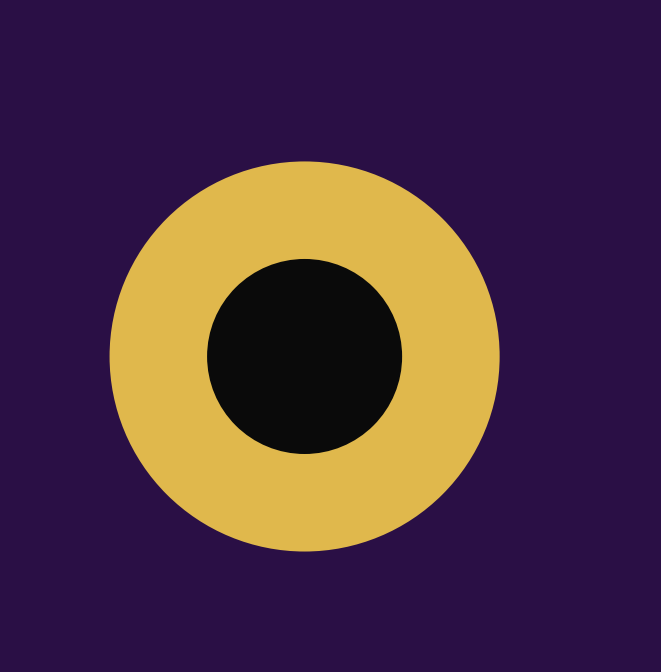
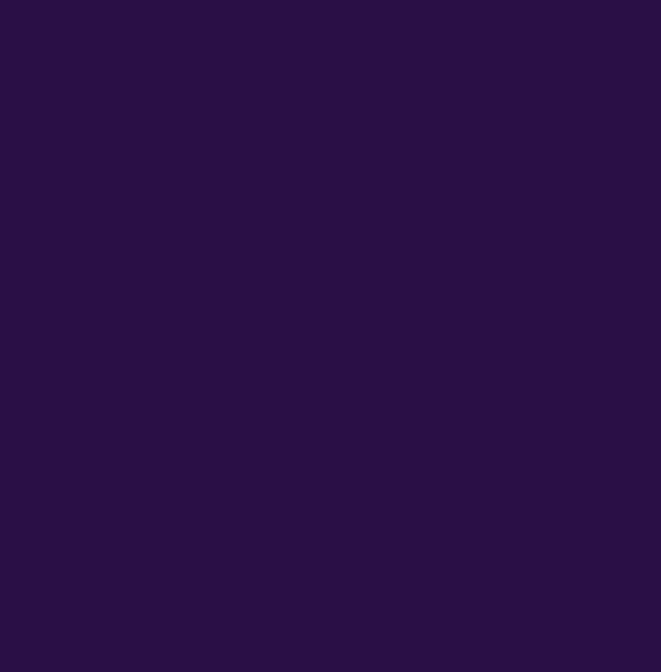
part: (304, 356) -> none

